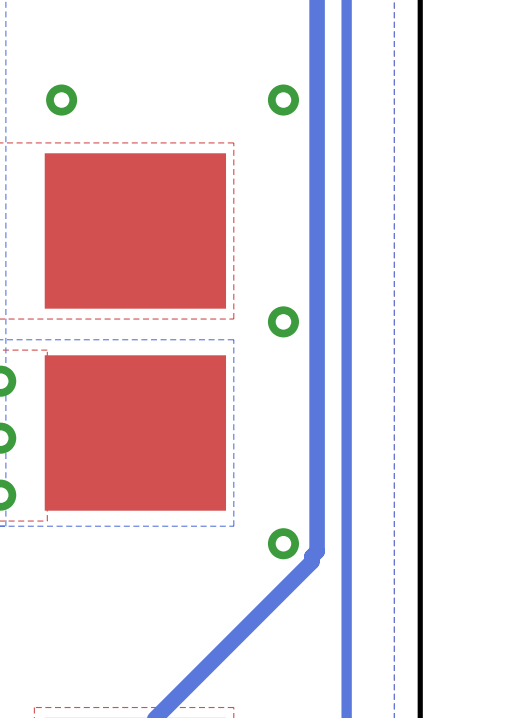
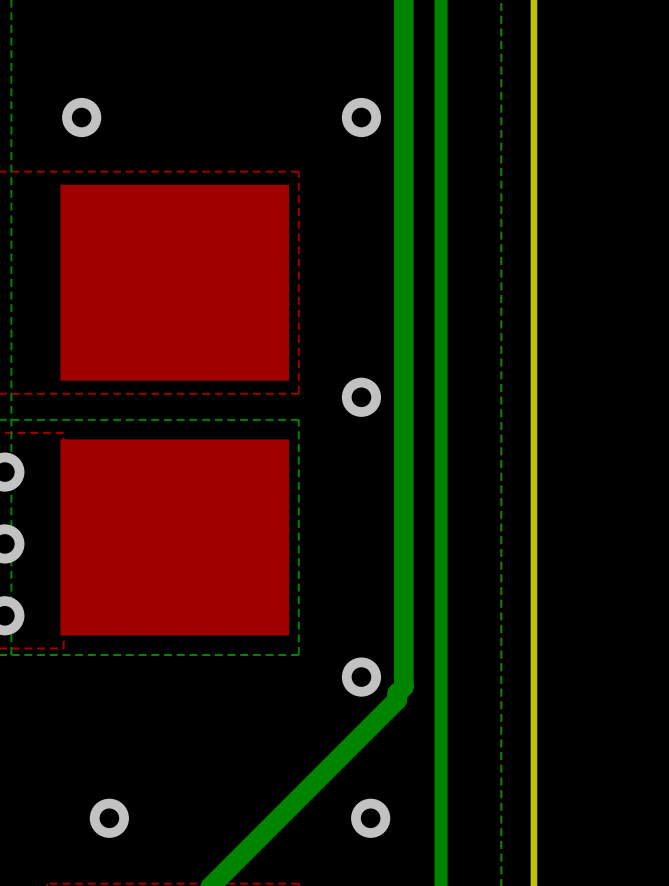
via: none -> (109, 818)
via: none -> (370, 818)

